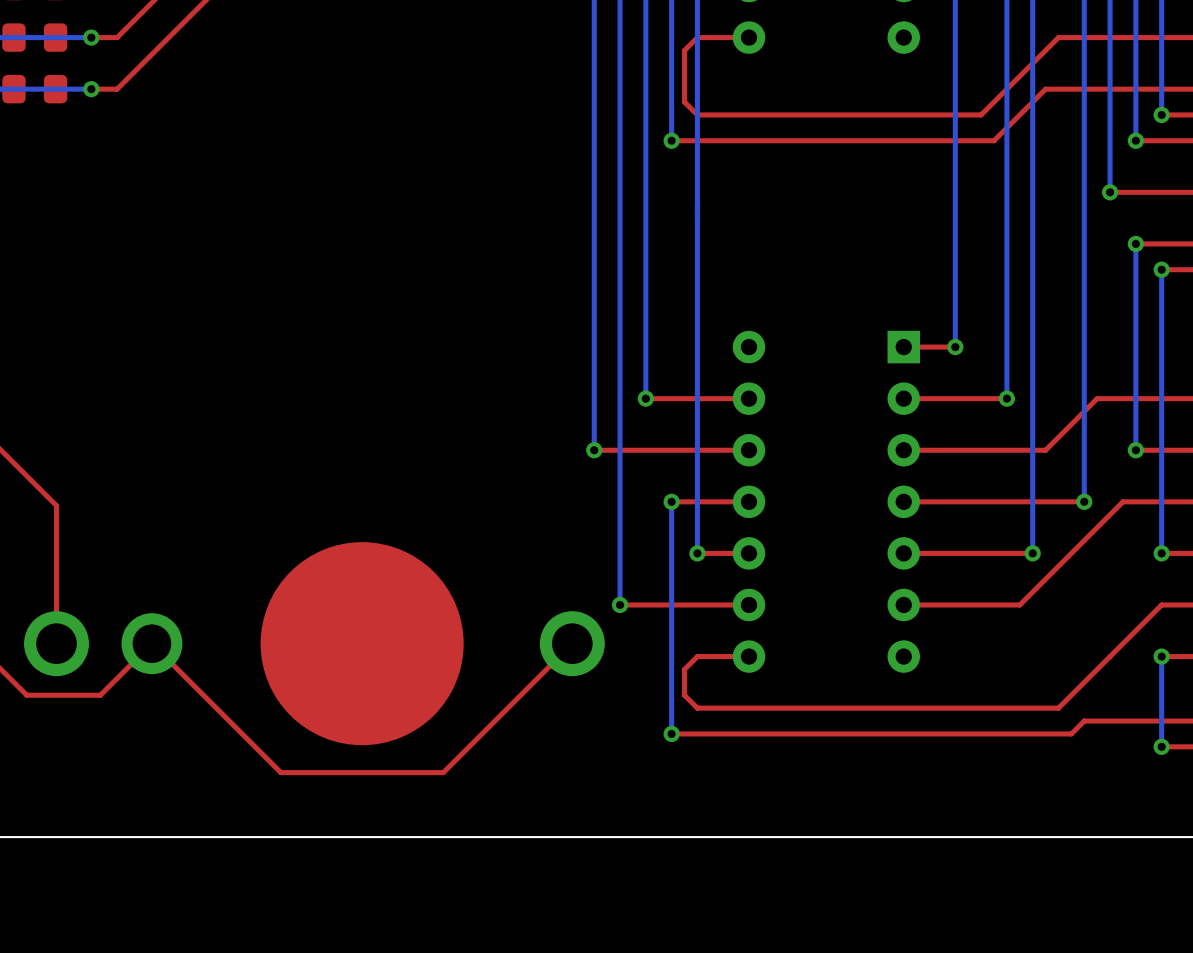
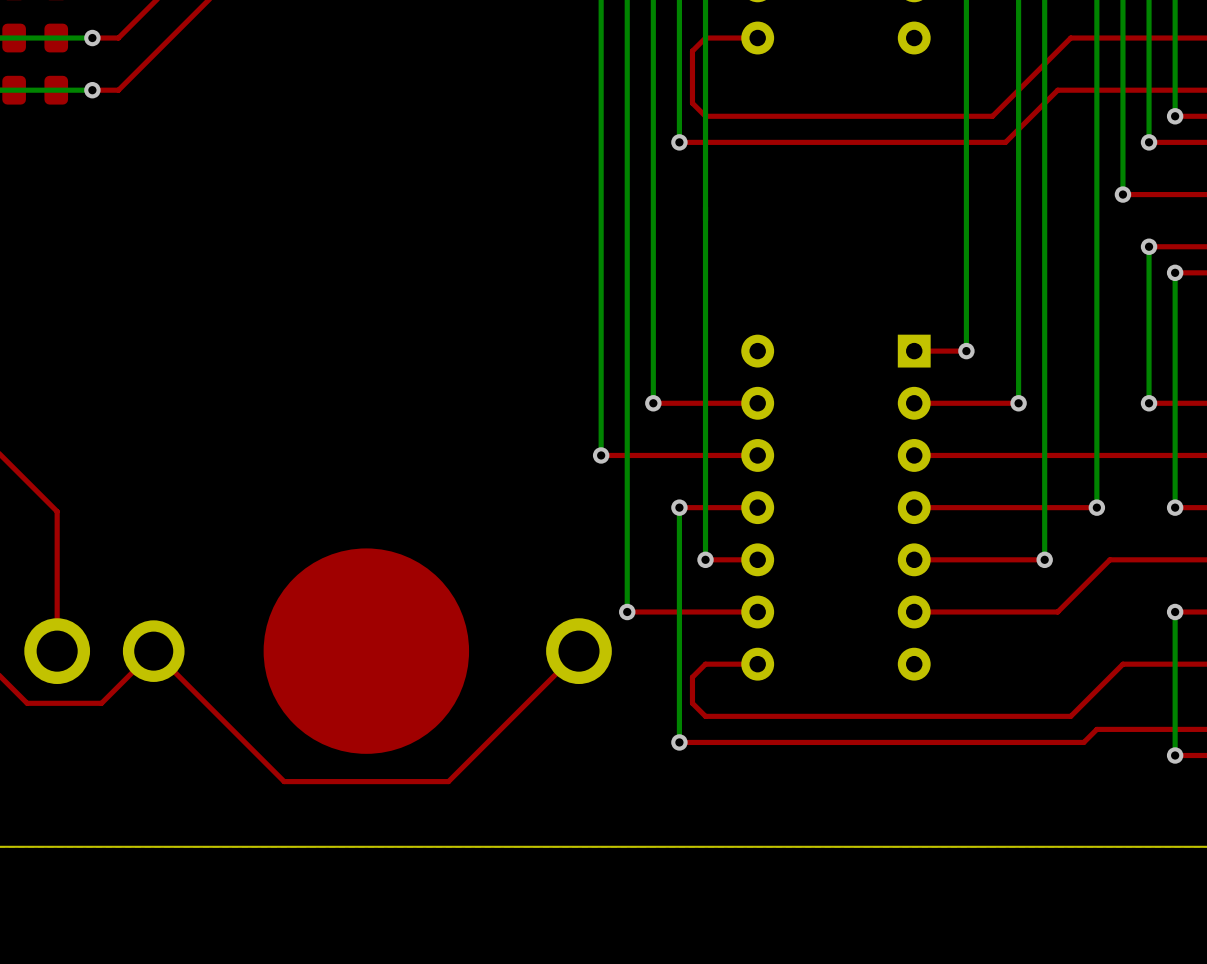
top track: (1135, 398) (1097, 398) (1045, 450) -> (1149, 455) (1057, 455)
bottom track: (1135, 398) (1135, 450) -> none
via: none -> (1149, 403)
via: (1135, 450) -> none
top track: (1161, 501) (1122, 501) (1019, 604) -> (1175, 559) (1109, 559) (1057, 612) (1031, 612)
bottom track: (1161, 501) (1161, 553) -> (1175, 612) (1175, 664)
via: none -> (1175, 507)
via: (1161, 553) -> none
top track: (1161, 604) (1110, 656) -> (1175, 664) (1122, 664)
via: none -> (1175, 612)
via: (1161, 656) -> none

